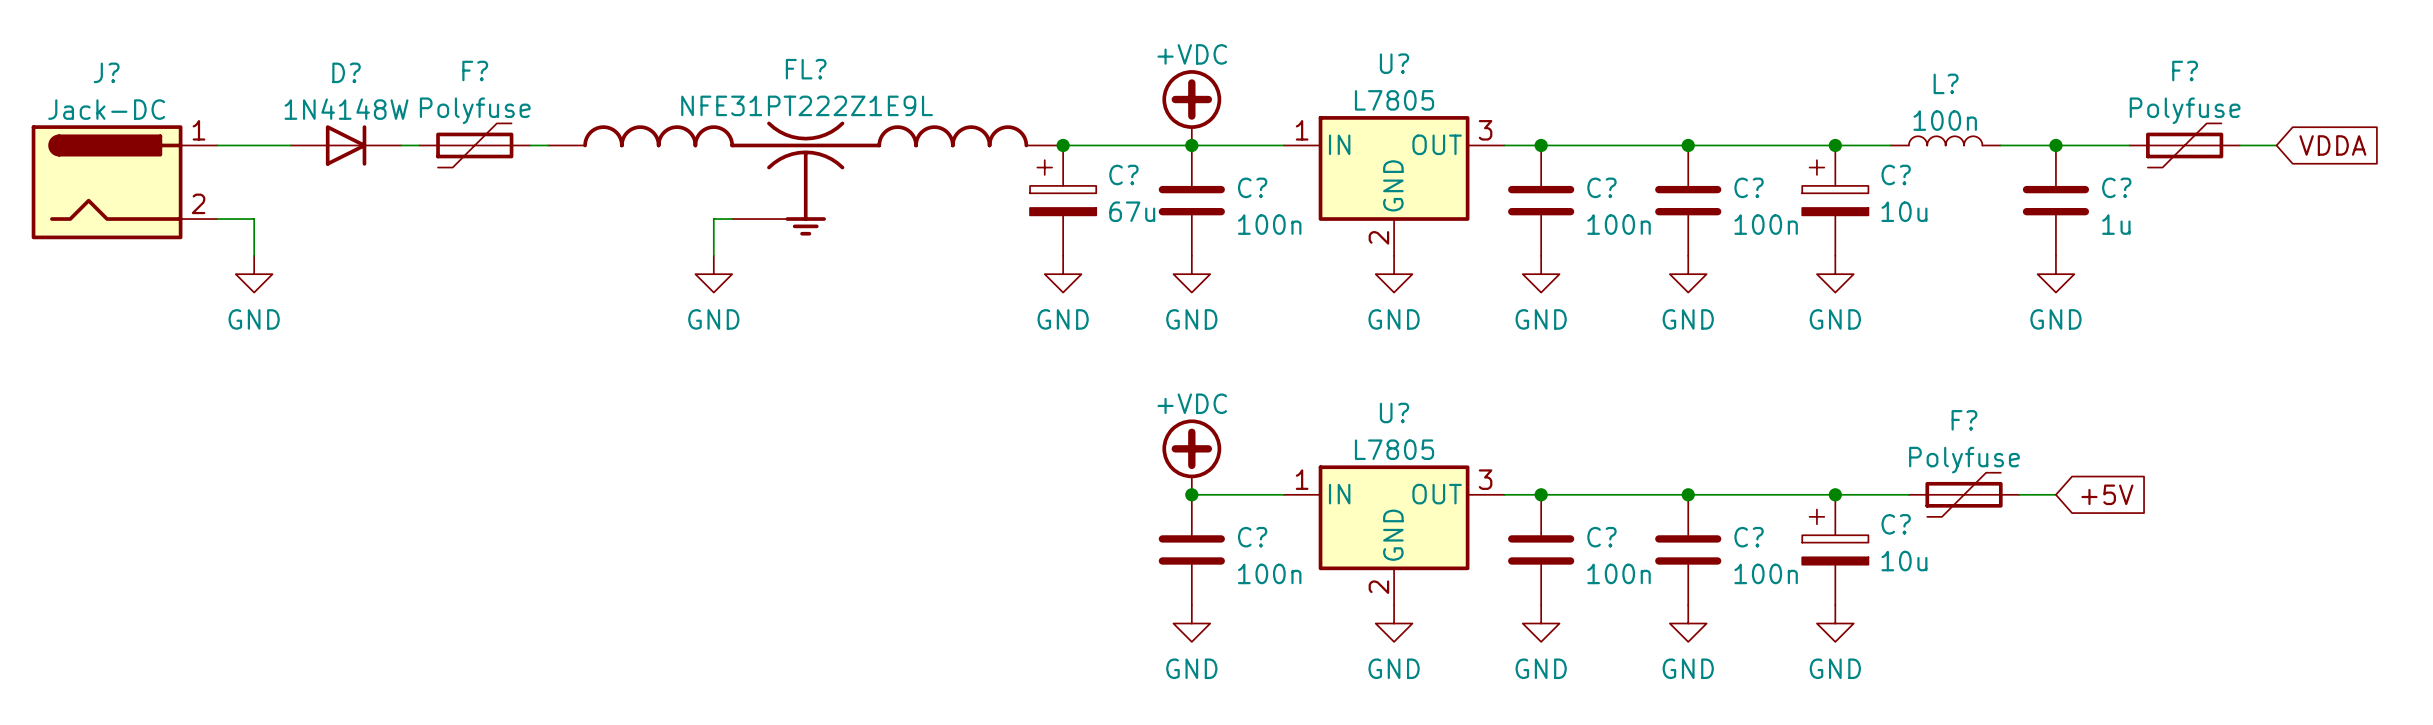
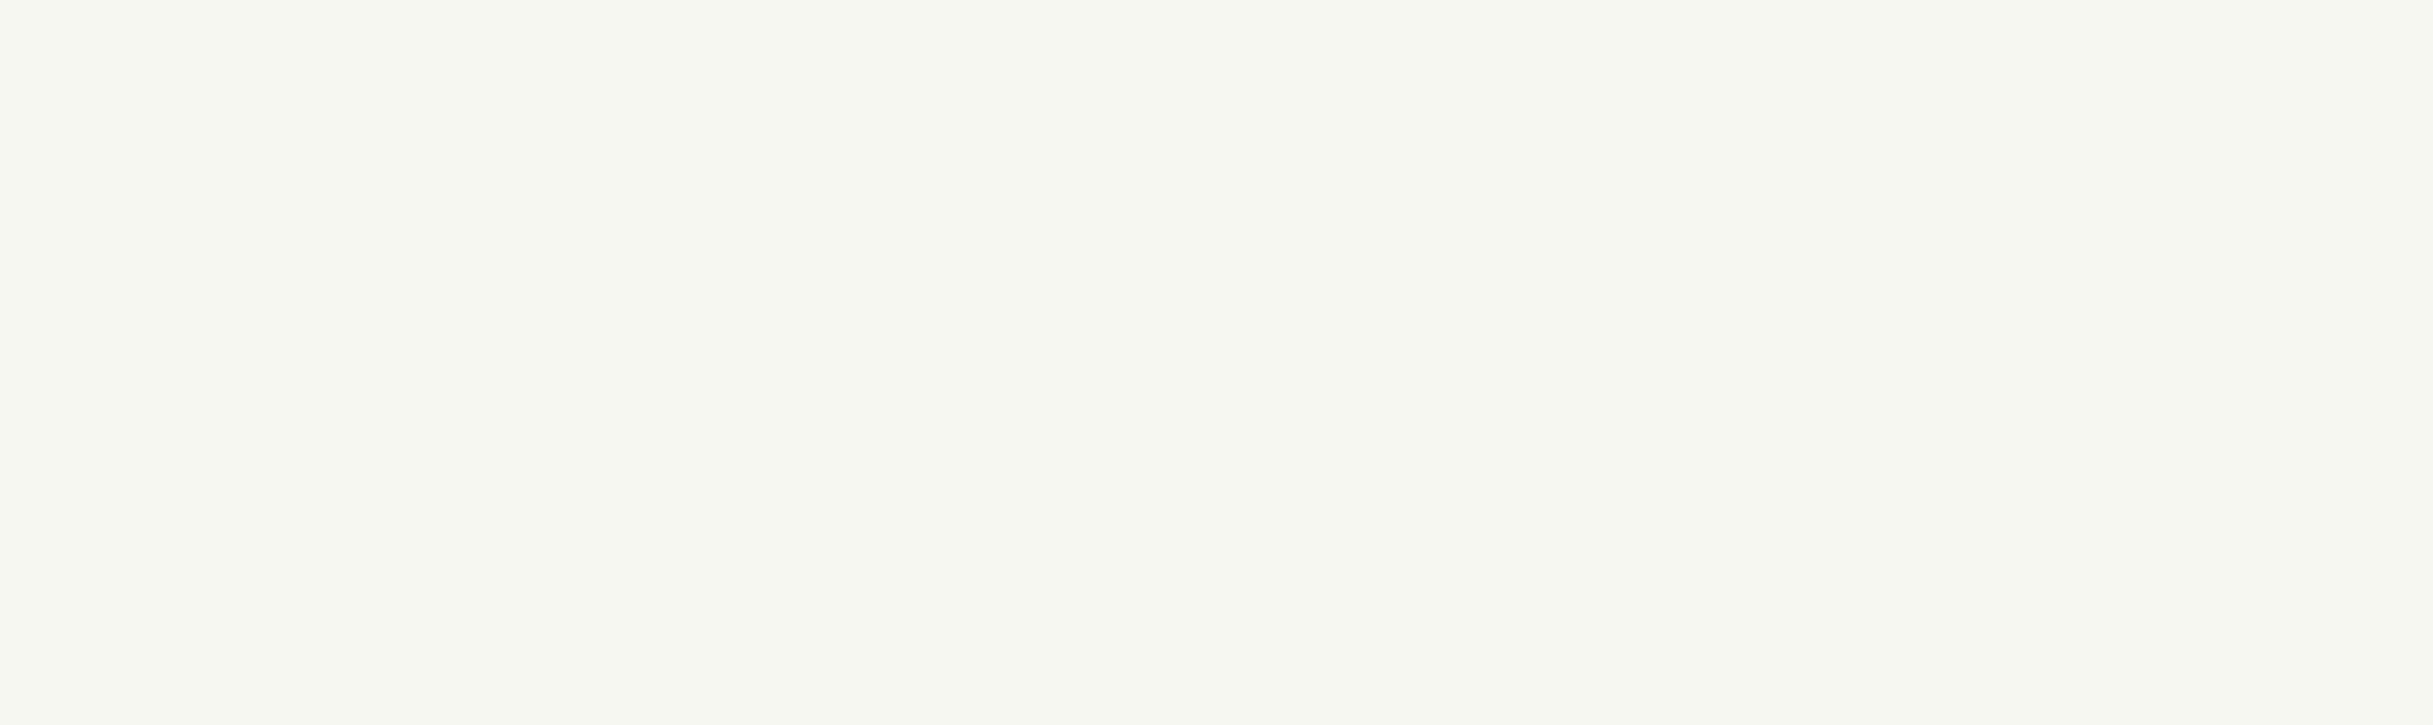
power symbol: +VDC (1191, 107) -> none
L?: 100n (1945, 140) -> none
wire: (217, 145) (290, 145) -> none
D?: 1N4148W (346, 145) -> none
wire: (401, 145) (419, 145) -> none
F?: Polyfuse (474, 145) -> none
wire: (529, 145) (548, 145) -> none
wire: (1063, 145) (1283, 145) -> none
junction: (1063, 145) -> none
junction: (1191, 145) -> none
wire: (1504, 145) (1890, 145) -> none
junction: (1541, 145) -> none
junction: (1688, 145) -> none
junction: (1835, 145) -> none
wire: (2000, 145) (2129, 145) -> none
junction: (2055, 145) -> none
F?: Polyfuse (2184, 145) -> none
wire: (2239, 145) (2276, 145) -> none
global label: VDDA (2332, 145) -> none
FL?: NFE31PT222Z1E9L (805, 178) -> none
J?: Jack-DC (124, 182) -> none
U?: L7805 (1394, 185) -> none
C?: 67u (1063, 200) -> none
C?: 100n (1191, 200) -> none
C?: 100n (1541, 200) -> none
C?: 100n (1688, 200) -> none
C?: 10u (1835, 200) -> none
C?: 1u (2055, 200) -> none
wire: (217, 219) (254, 219) (254, 255) -> none
wire: (732, 219) (713, 219) (713, 255) -> none
power symbol: GND (254, 274) -> none
power symbol: GND (713, 274) -> none
power symbol: GND (1063, 274) -> none
power symbol: GND (1191, 274) -> none
power symbol: GND (1394, 274) -> none
power symbol: GND (1541, 274) -> none
power symbol: GND (1688, 274) -> none
power symbol: GND (1835, 274) -> none
power symbol: GND (2055, 274) -> none
power symbol: +VDC (1191, 457) -> none
wire: (1191, 494) (1283, 494) -> none
junction: (1191, 494) -> none
wire: (1504, 494) (1908, 494) -> none
junction: (1541, 494) -> none
junction: (1688, 494) -> none
junction: (1835, 494) -> none
F?: Polyfuse (1964, 494) -> none
wire: (2019, 494) (2055, 494) -> none
global label: +5V (2107, 494) -> none
U?: L7805 (1394, 535) -> none
C?: 100n (1191, 549) -> none
C?: 100n (1541, 549) -> none
C?: 100n (1688, 549) -> none
C?: 10u (1835, 549) -> none
power symbol: GND (1191, 623) -> none
power symbol: GND (1394, 623) -> none
power symbol: GND (1541, 623) -> none
power symbol: GND (1688, 623) -> none
power symbol: GND (1835, 623) -> none

